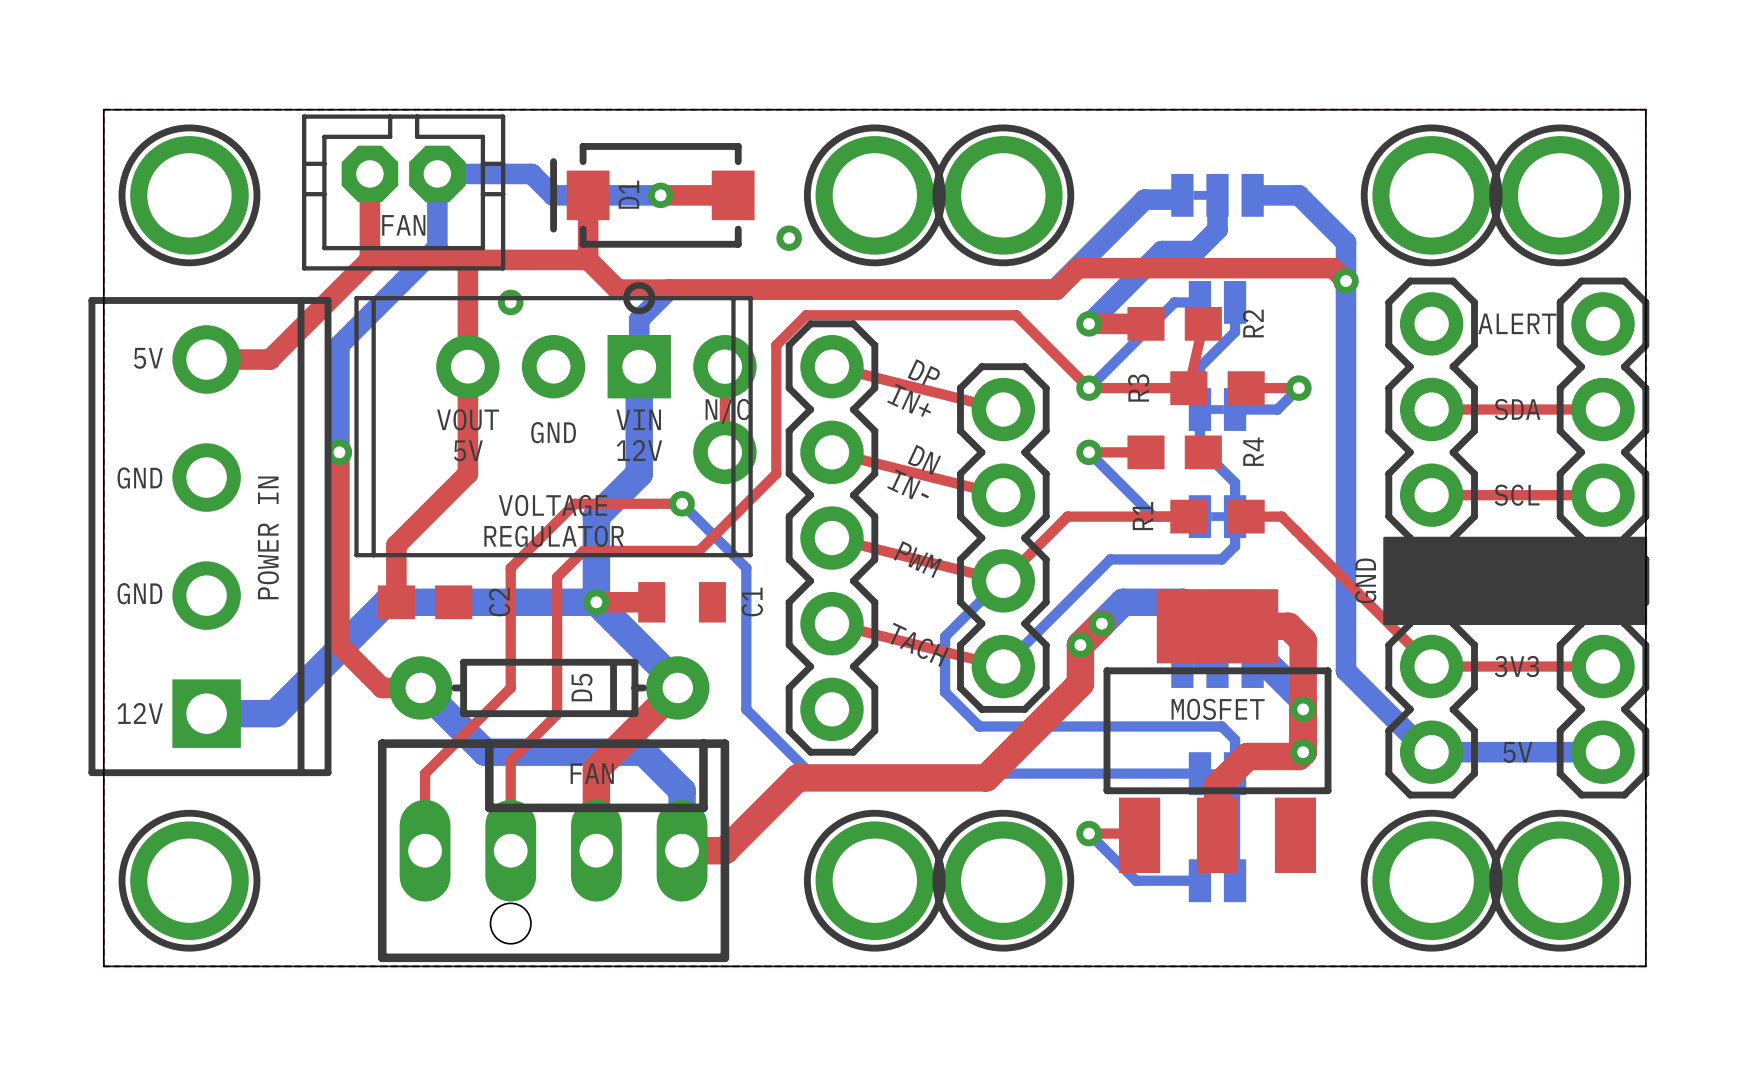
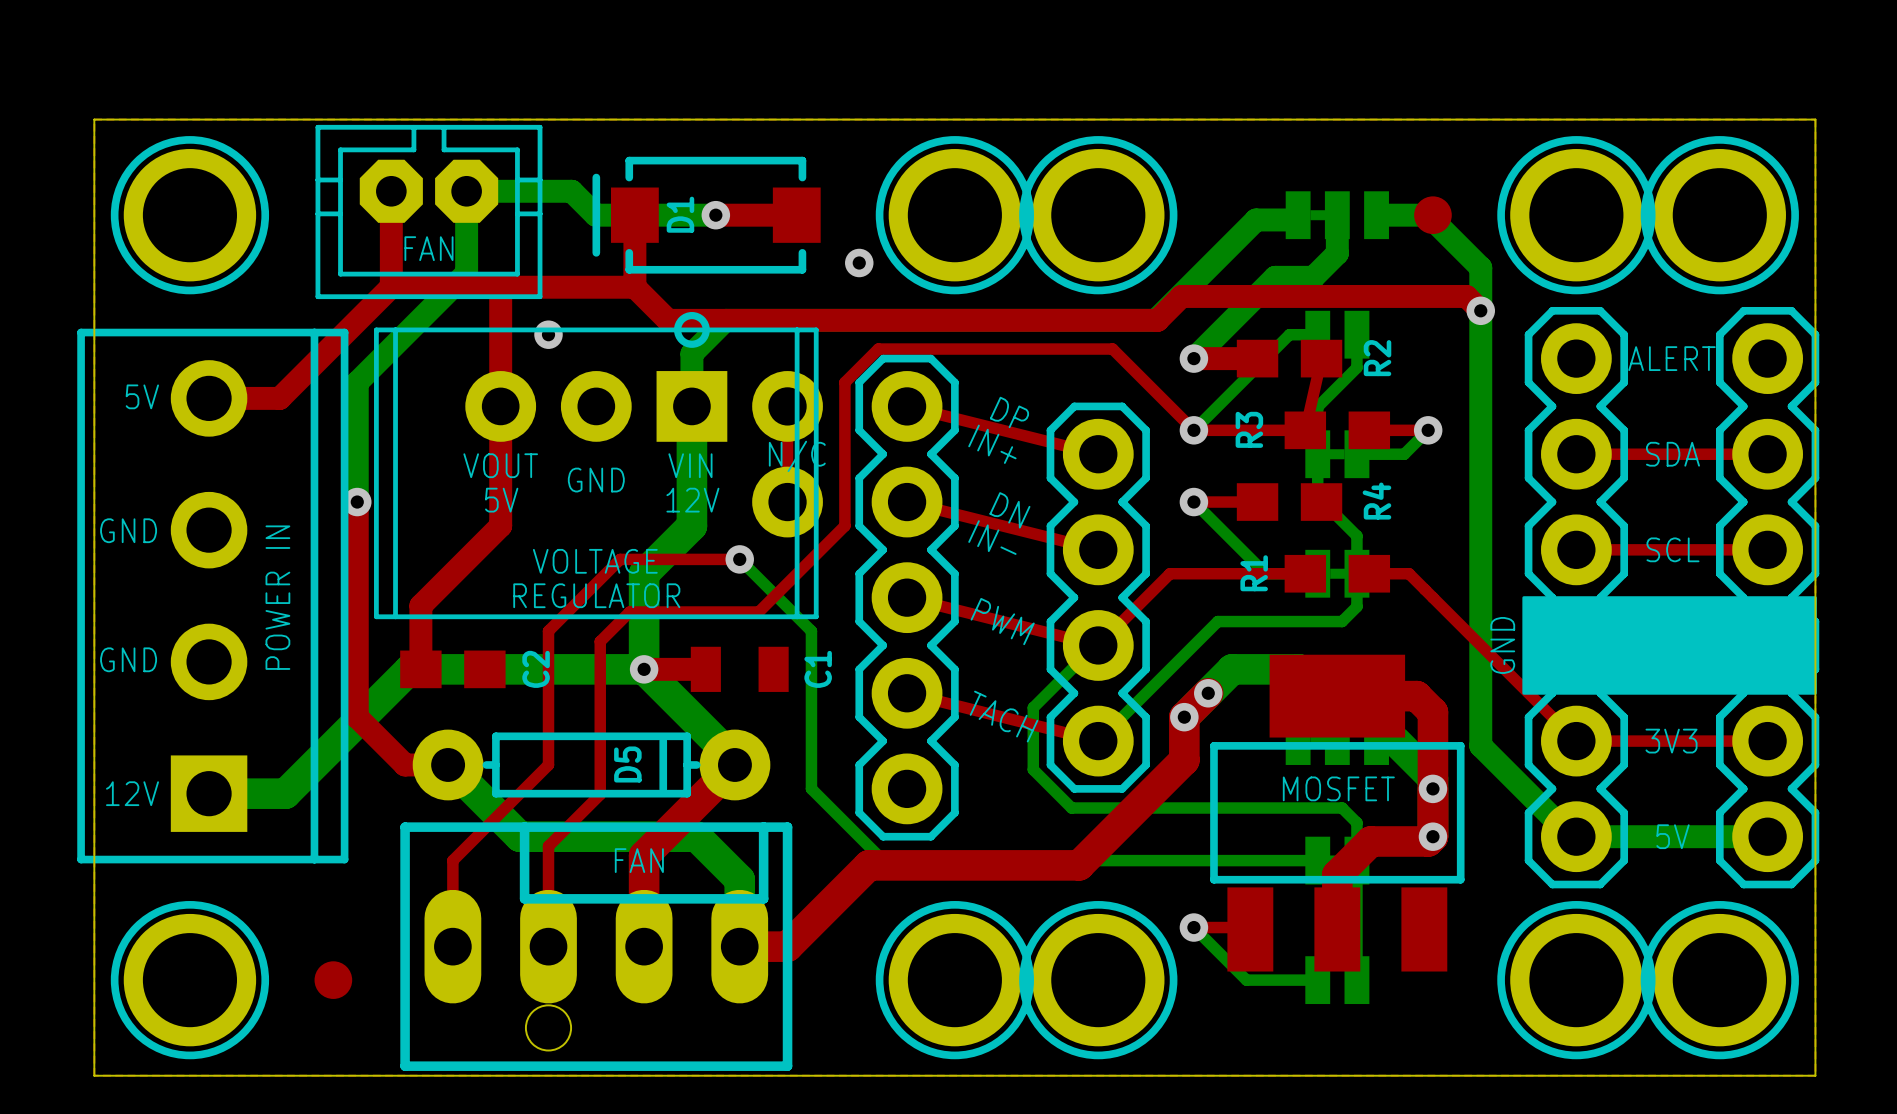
part: none -> (1432, 215)
part: none -> (333, 980)

